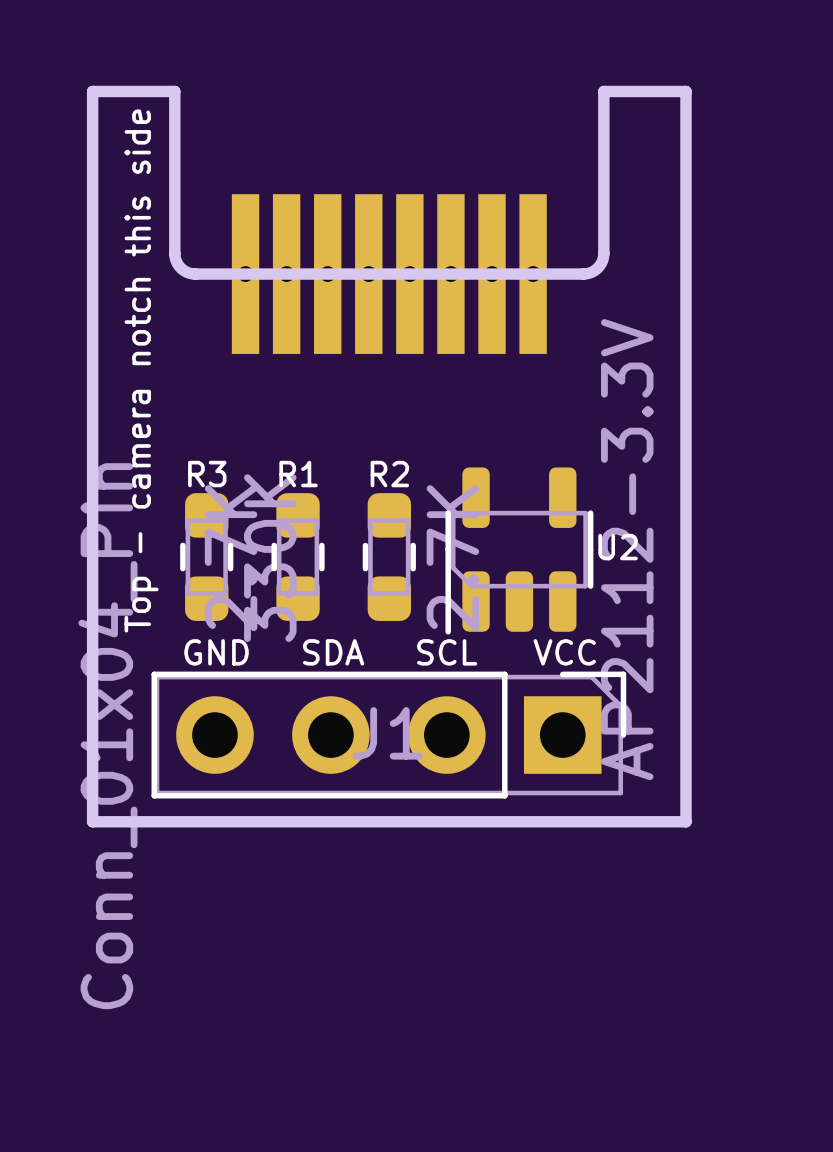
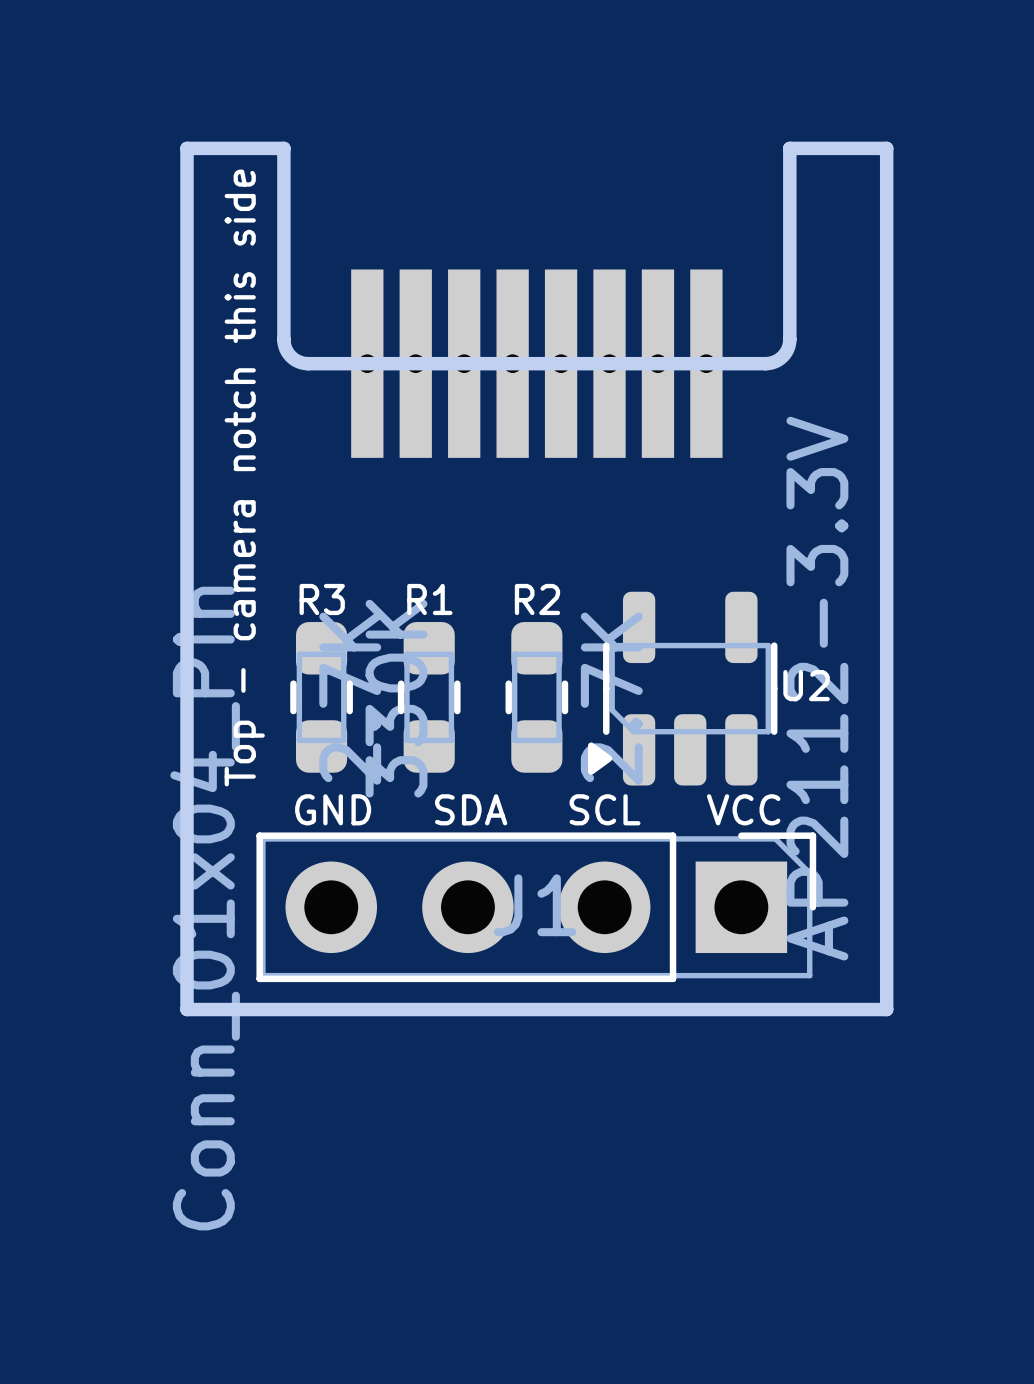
U2 footprint: [445, 467, 594, 635] -> [587, 591, 778, 786]

